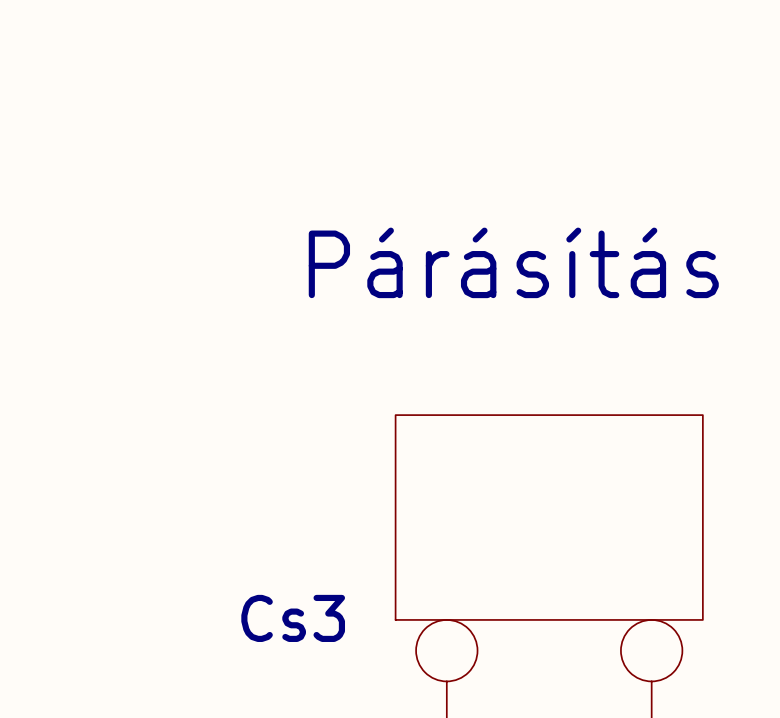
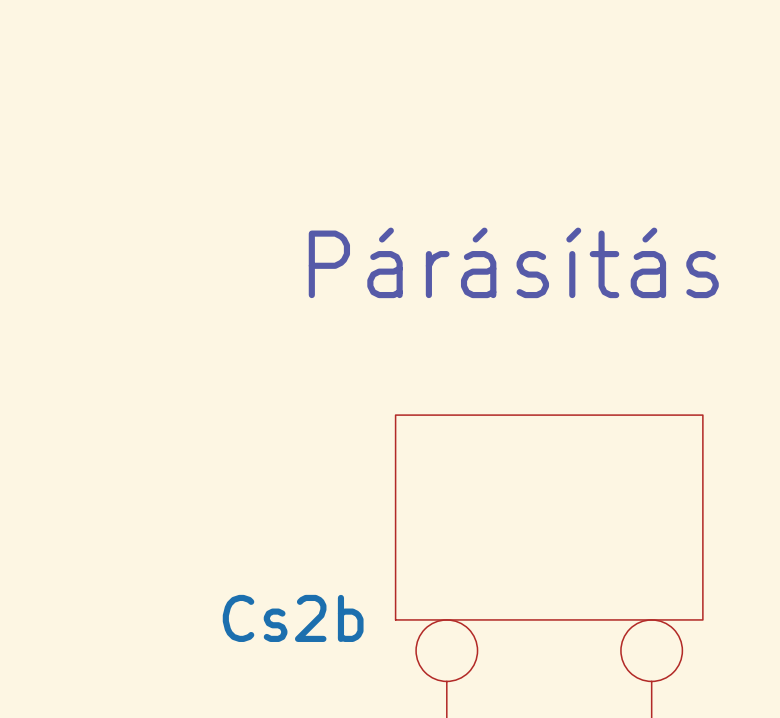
Cs3 name: Cs3 (293, 618) -> Cs2b (293, 618)

